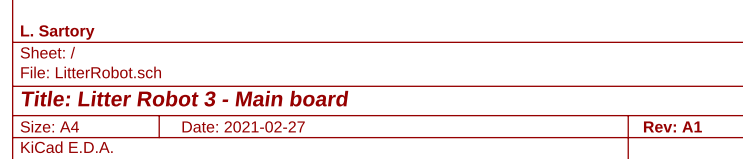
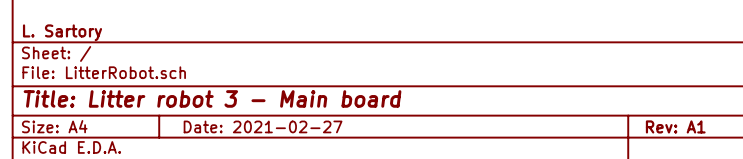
title block: Title: Litter Robot 3 - Main board (185, 98) -> Title: Litter robot 3 - Main board (212, 98)

